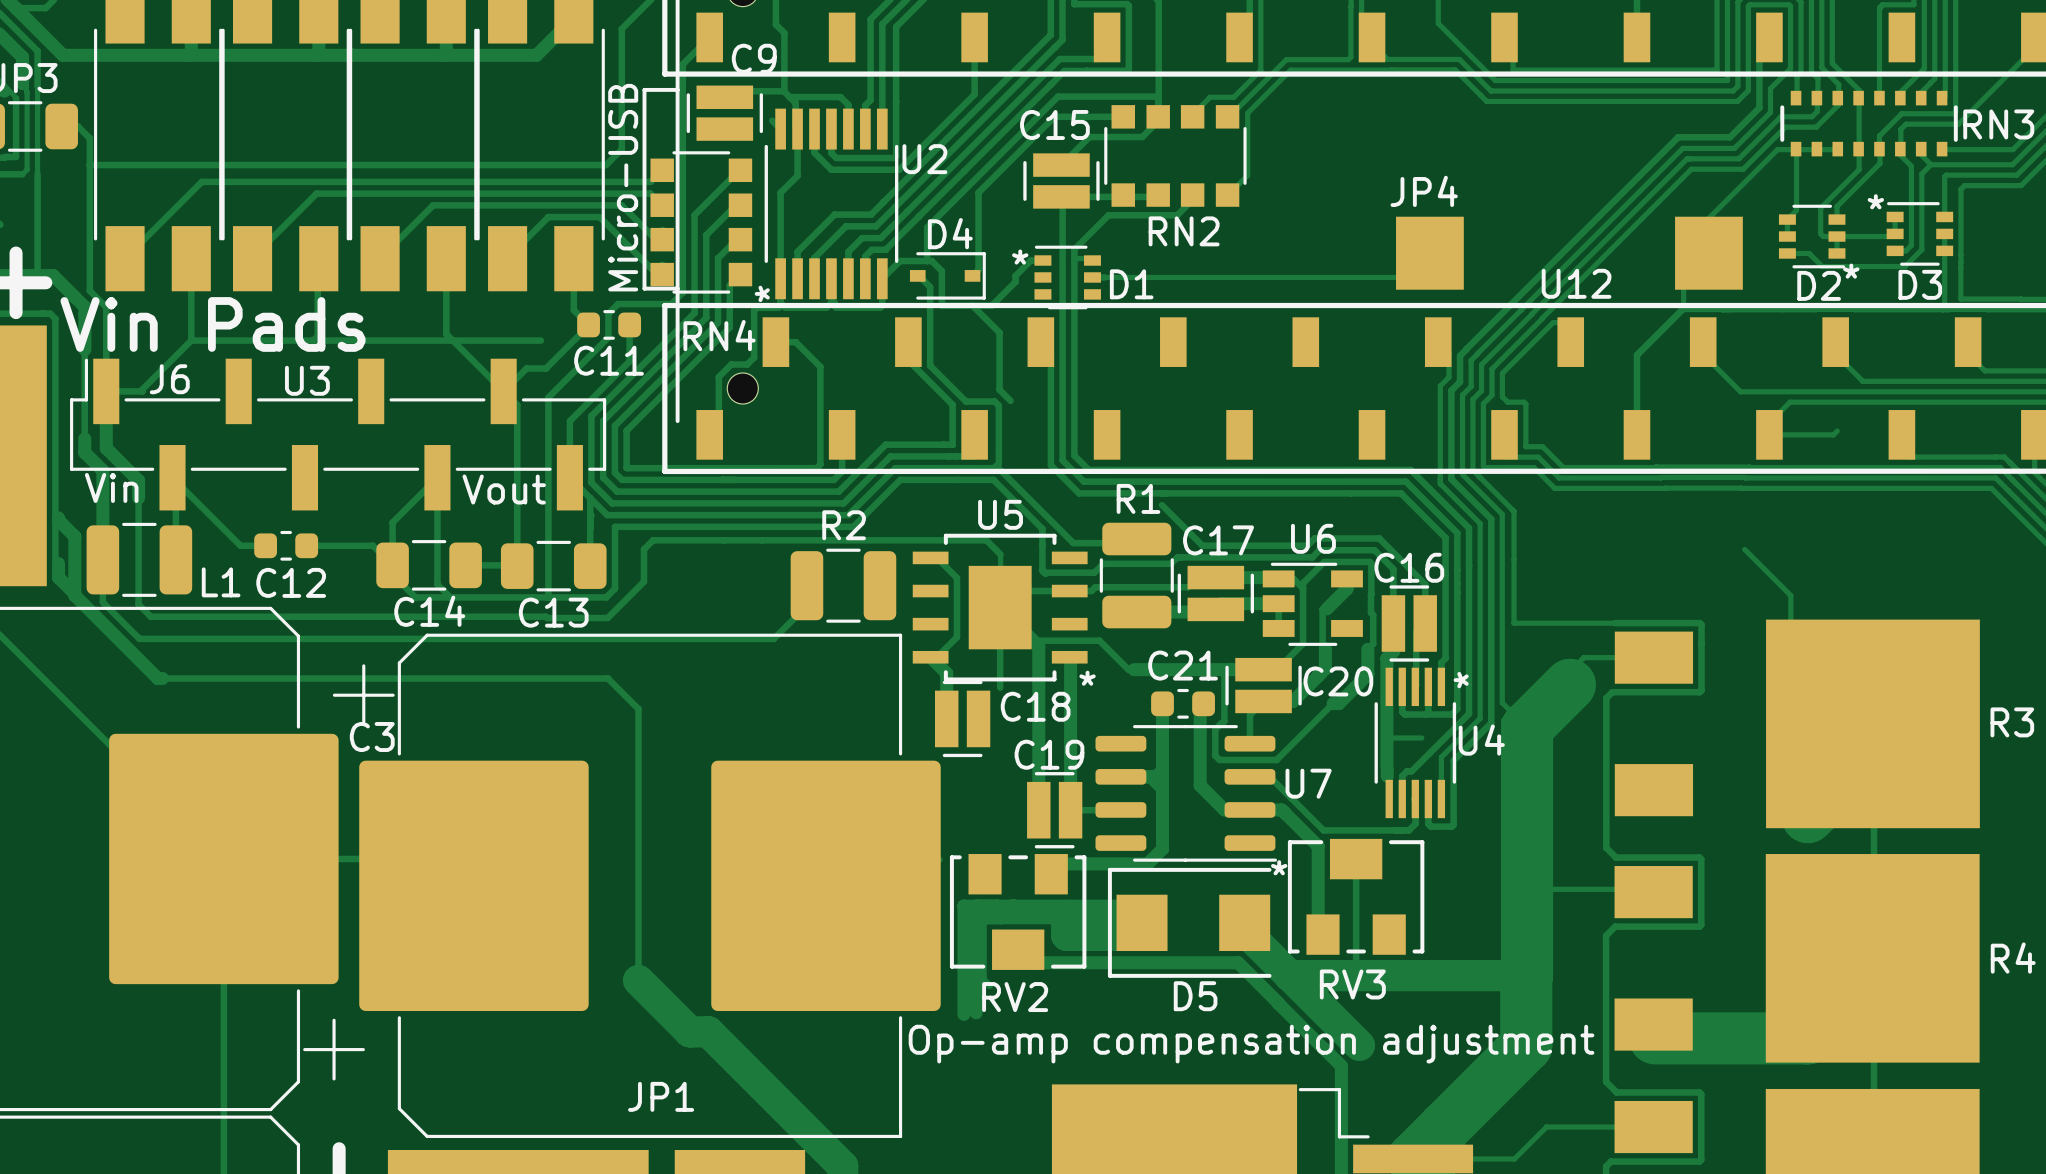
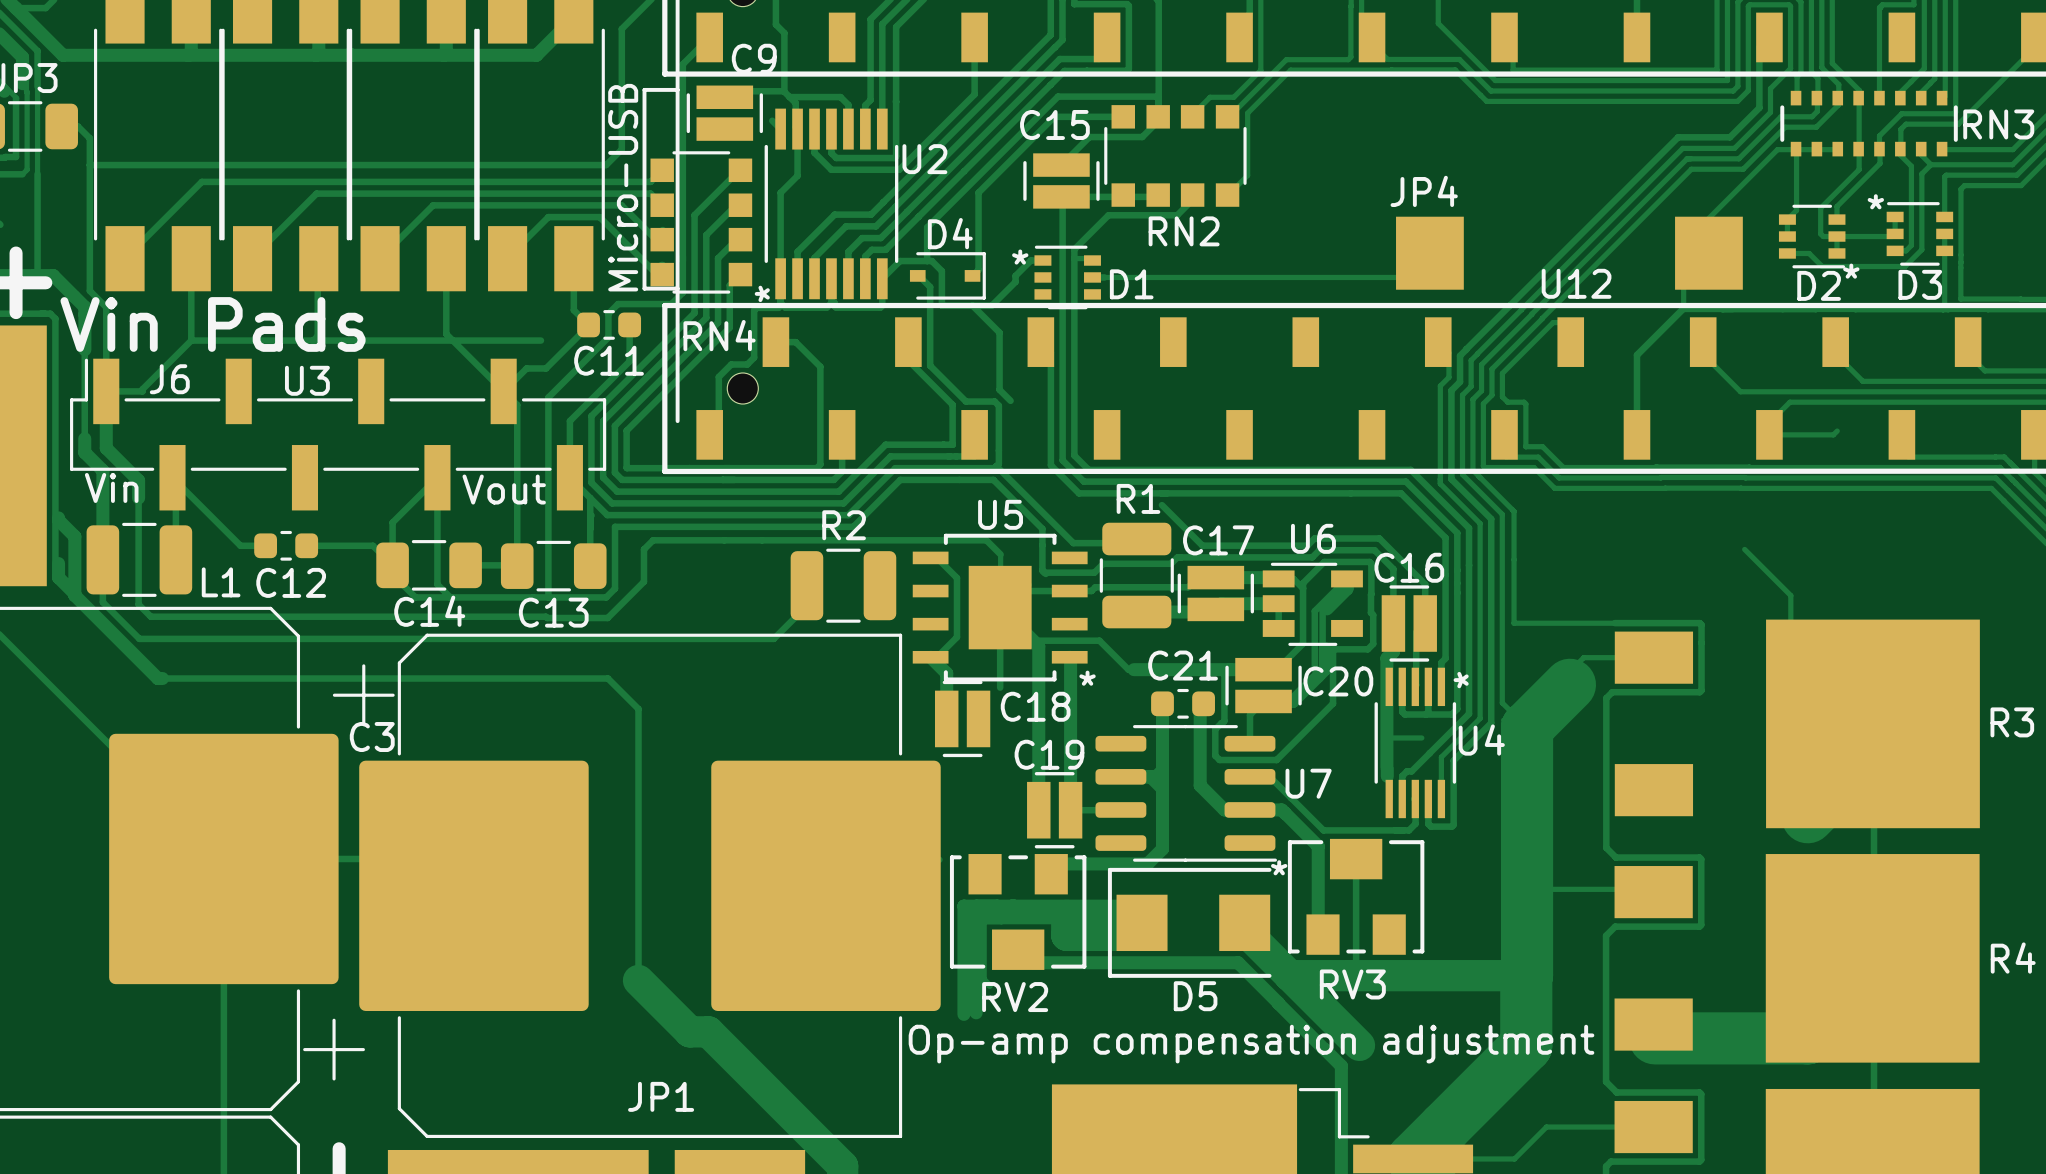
track: none -> (1347, 578) (1314, 611) (1314, 669)
track: (1367, 649) (1367, 674) (1338, 703) (1333, 703) -> (1367, 649) (1333, 649) (1333, 703)

